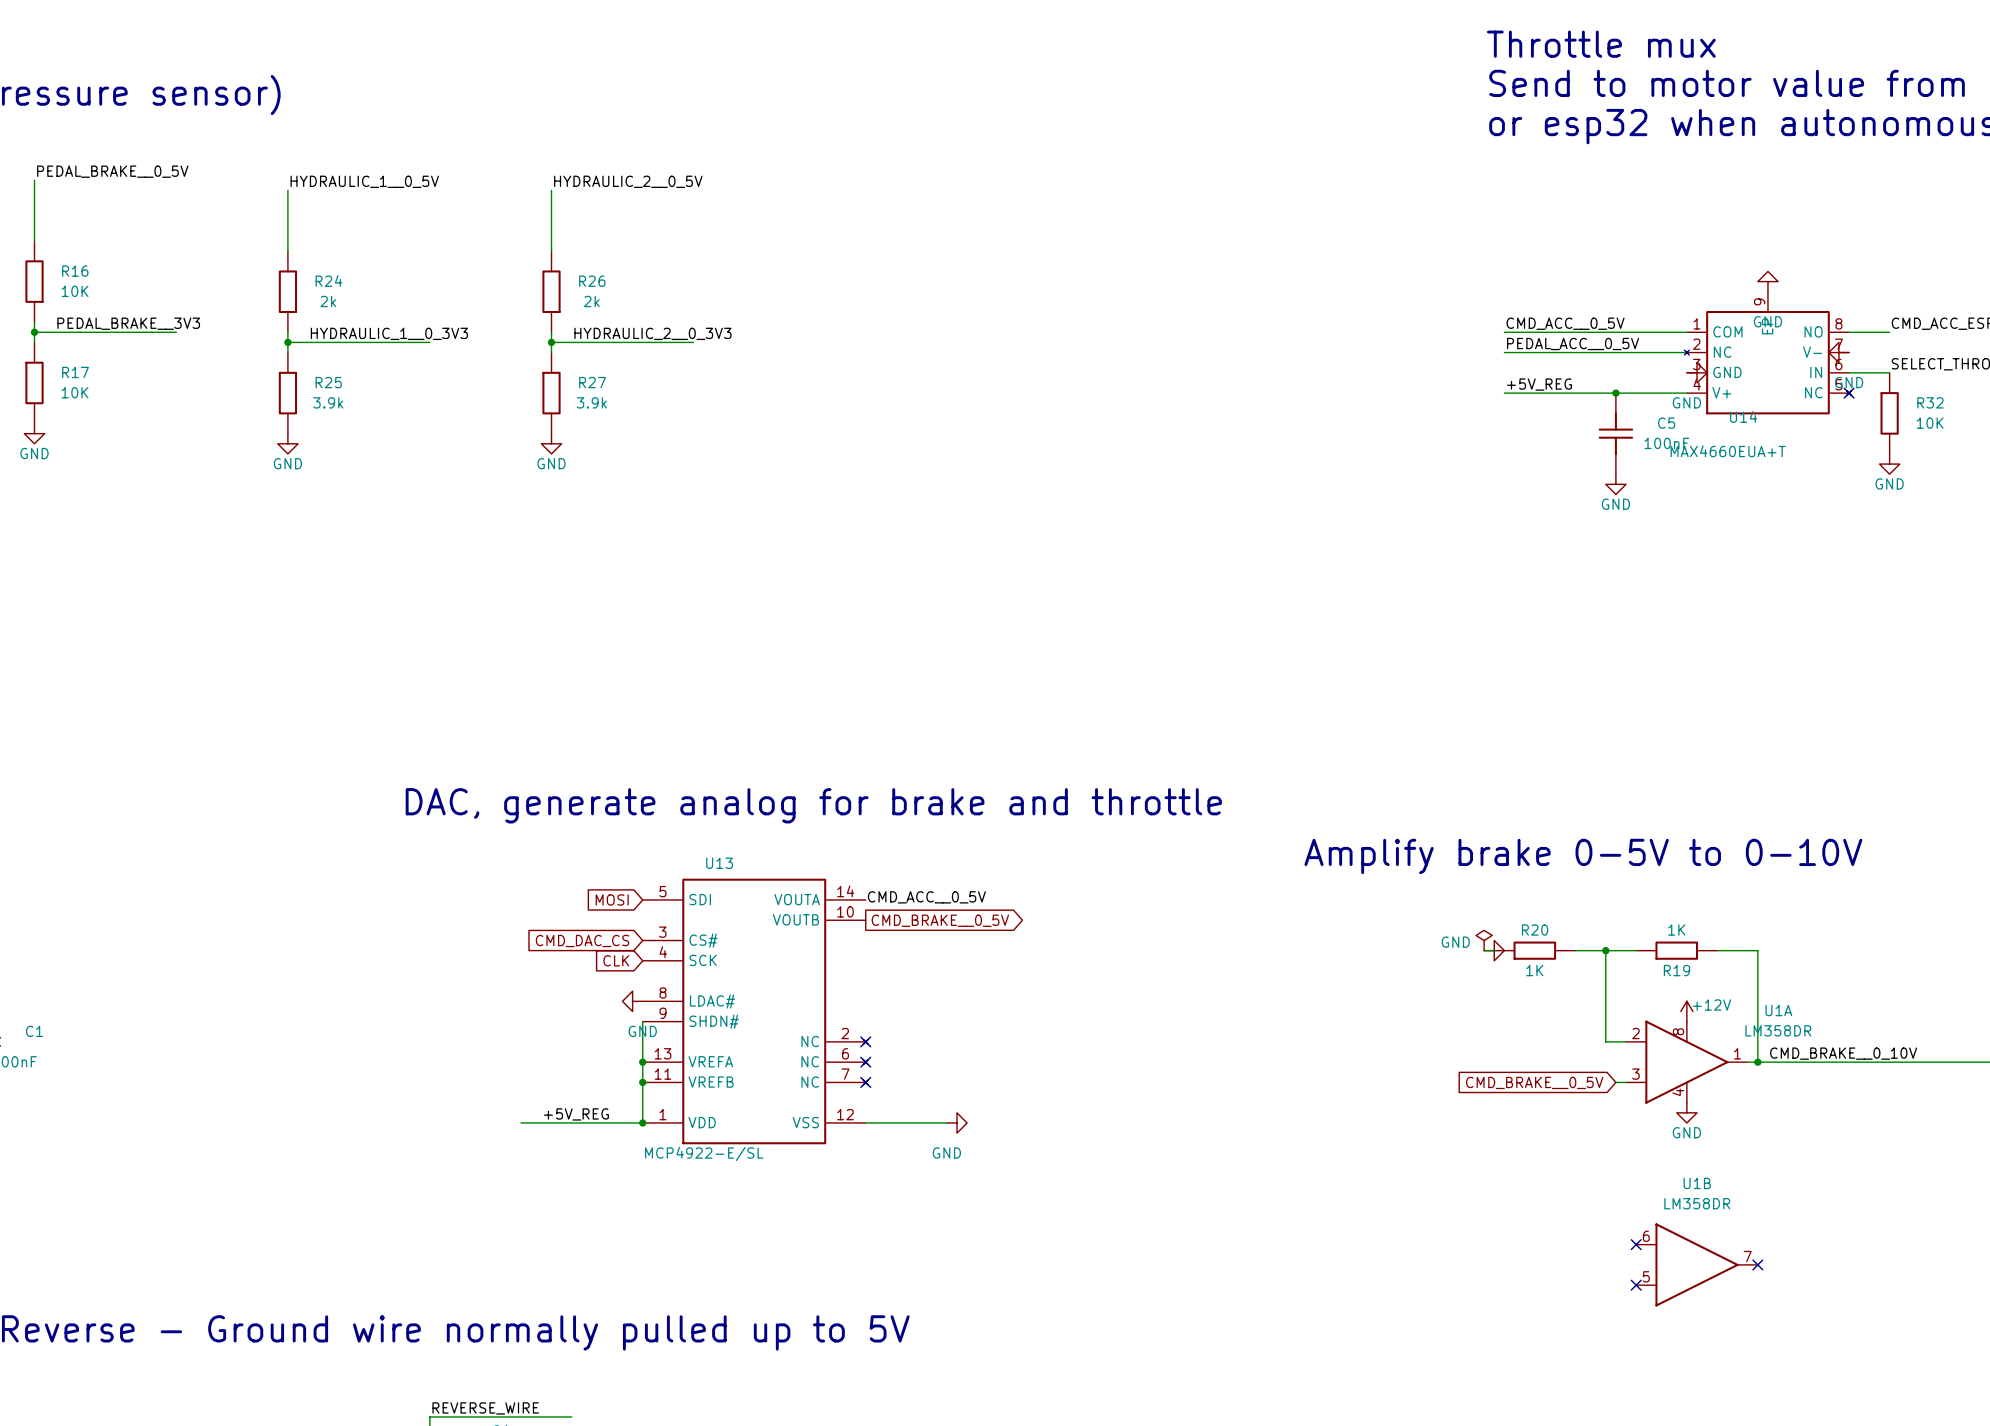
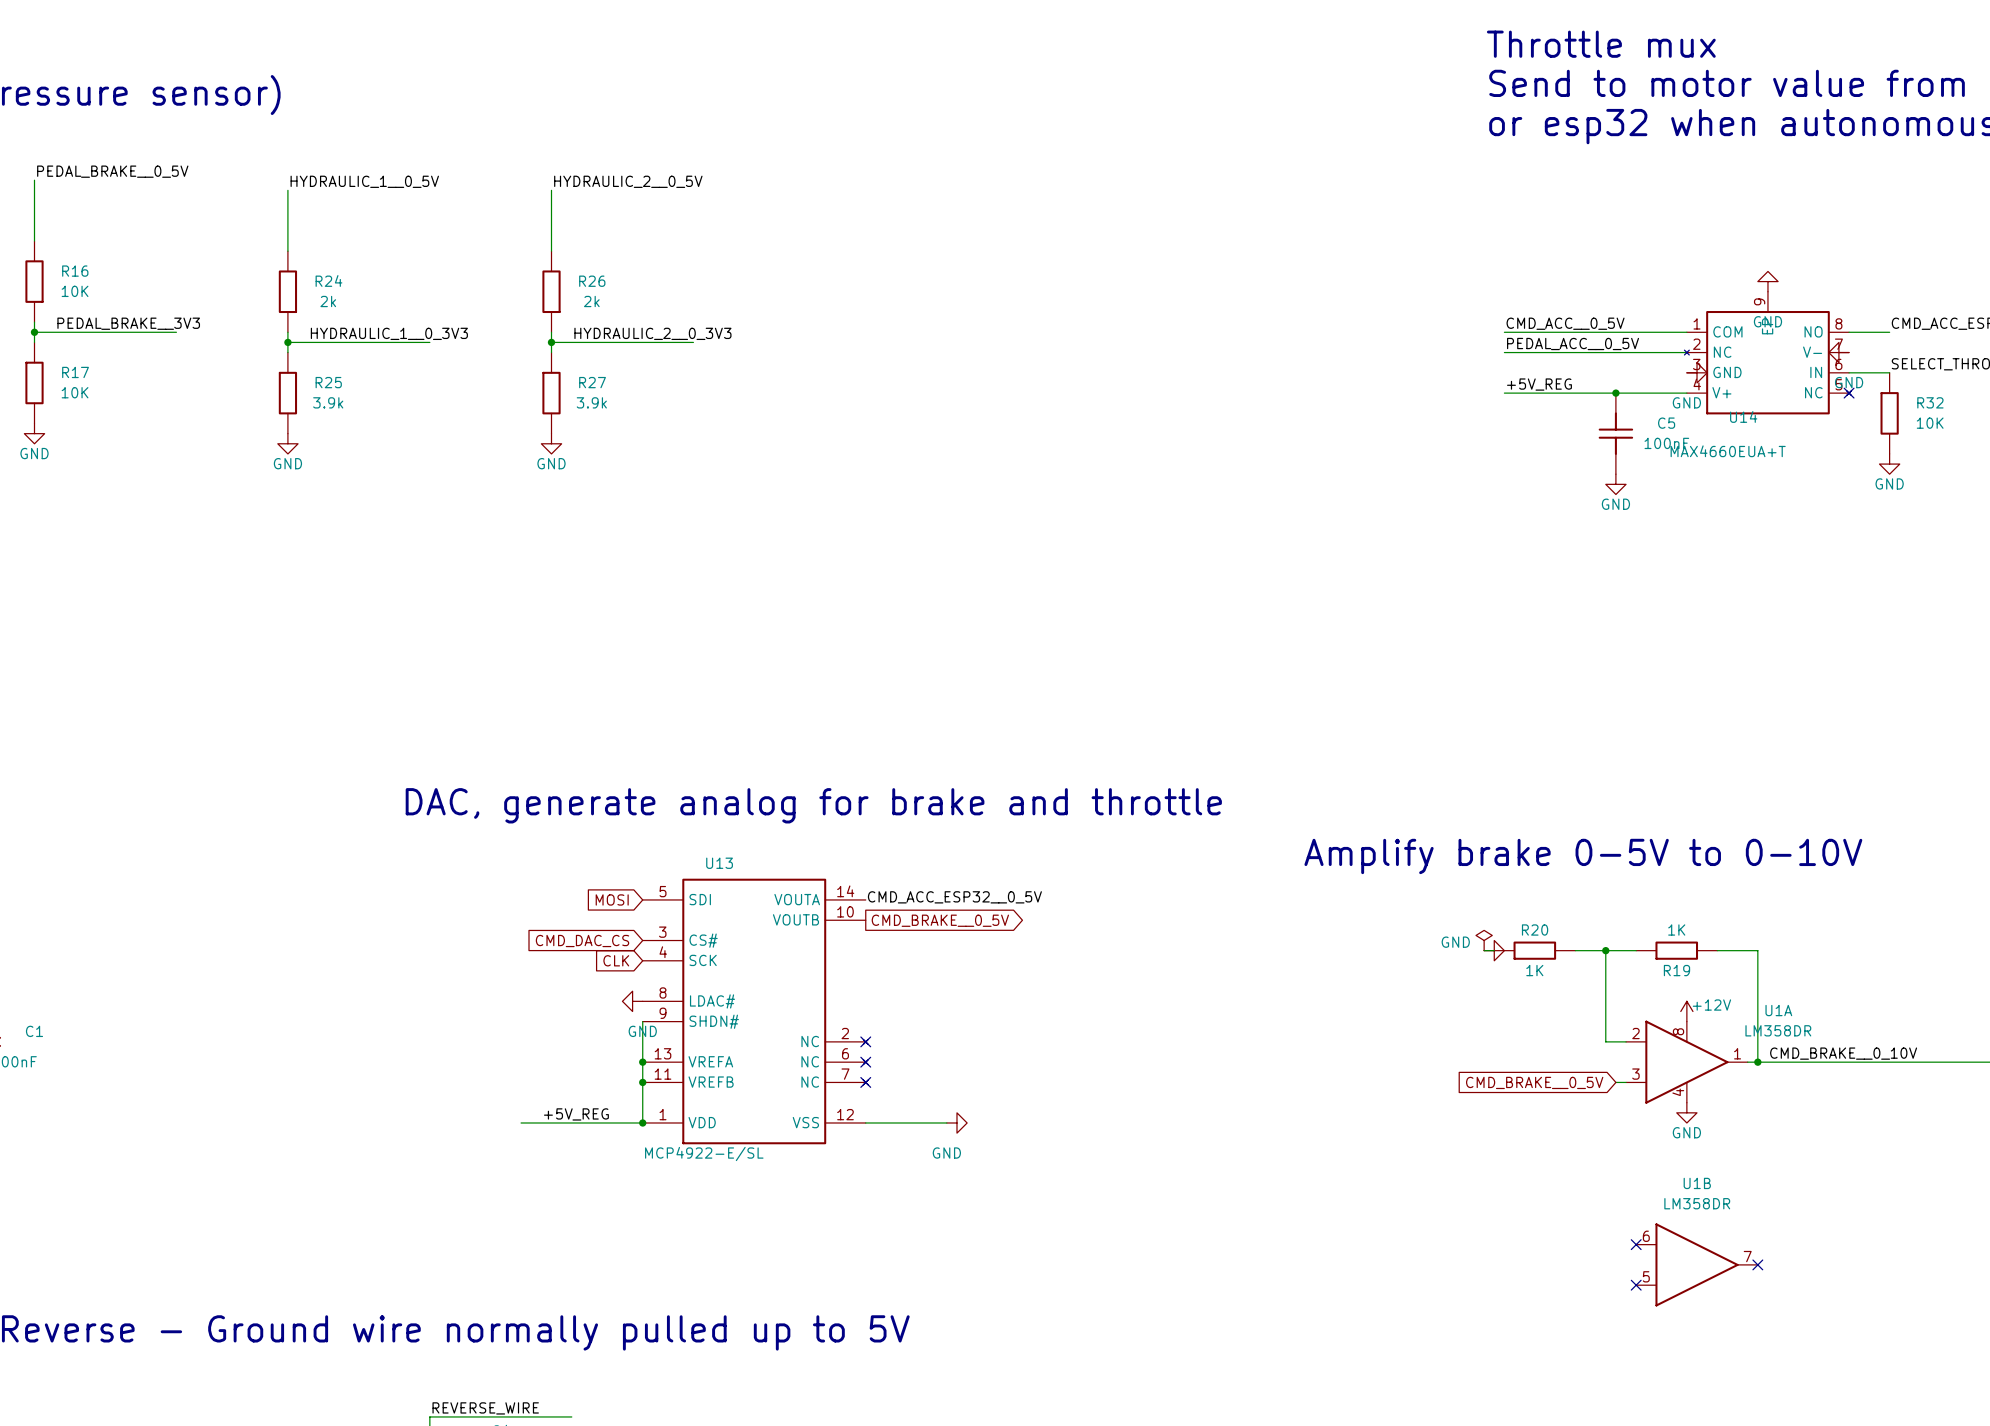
label: CMD_ACC__0_5V (926, 897) -> CMD_ACC_ESP32__0_5V (954, 897)

